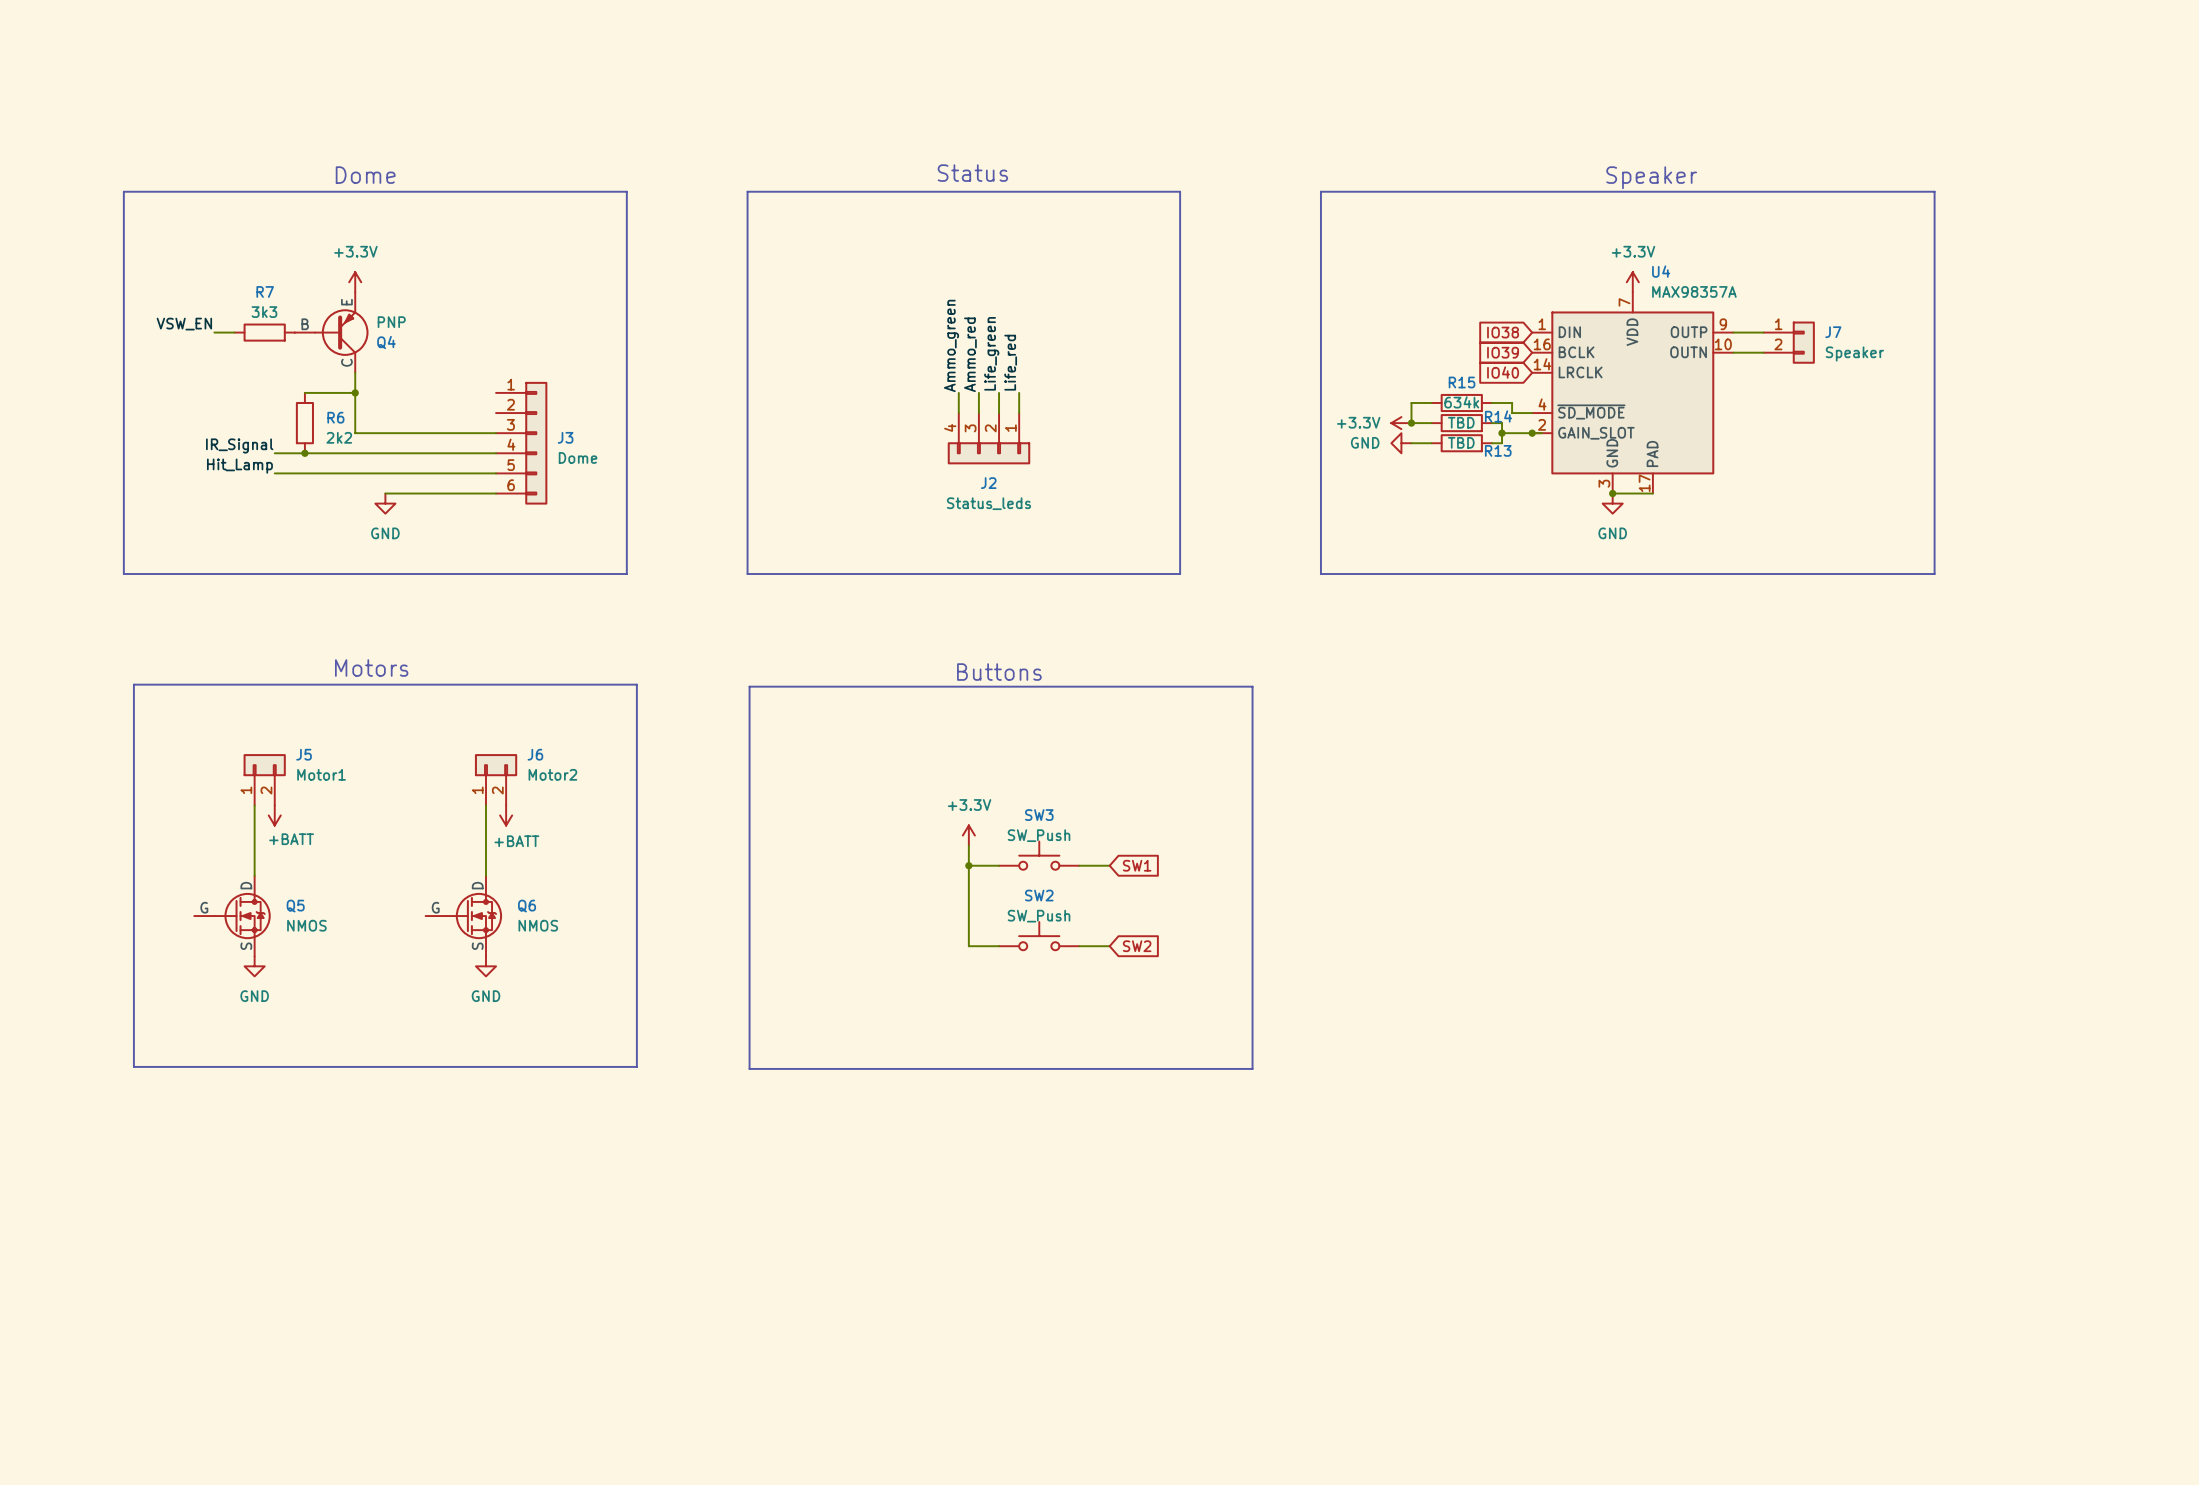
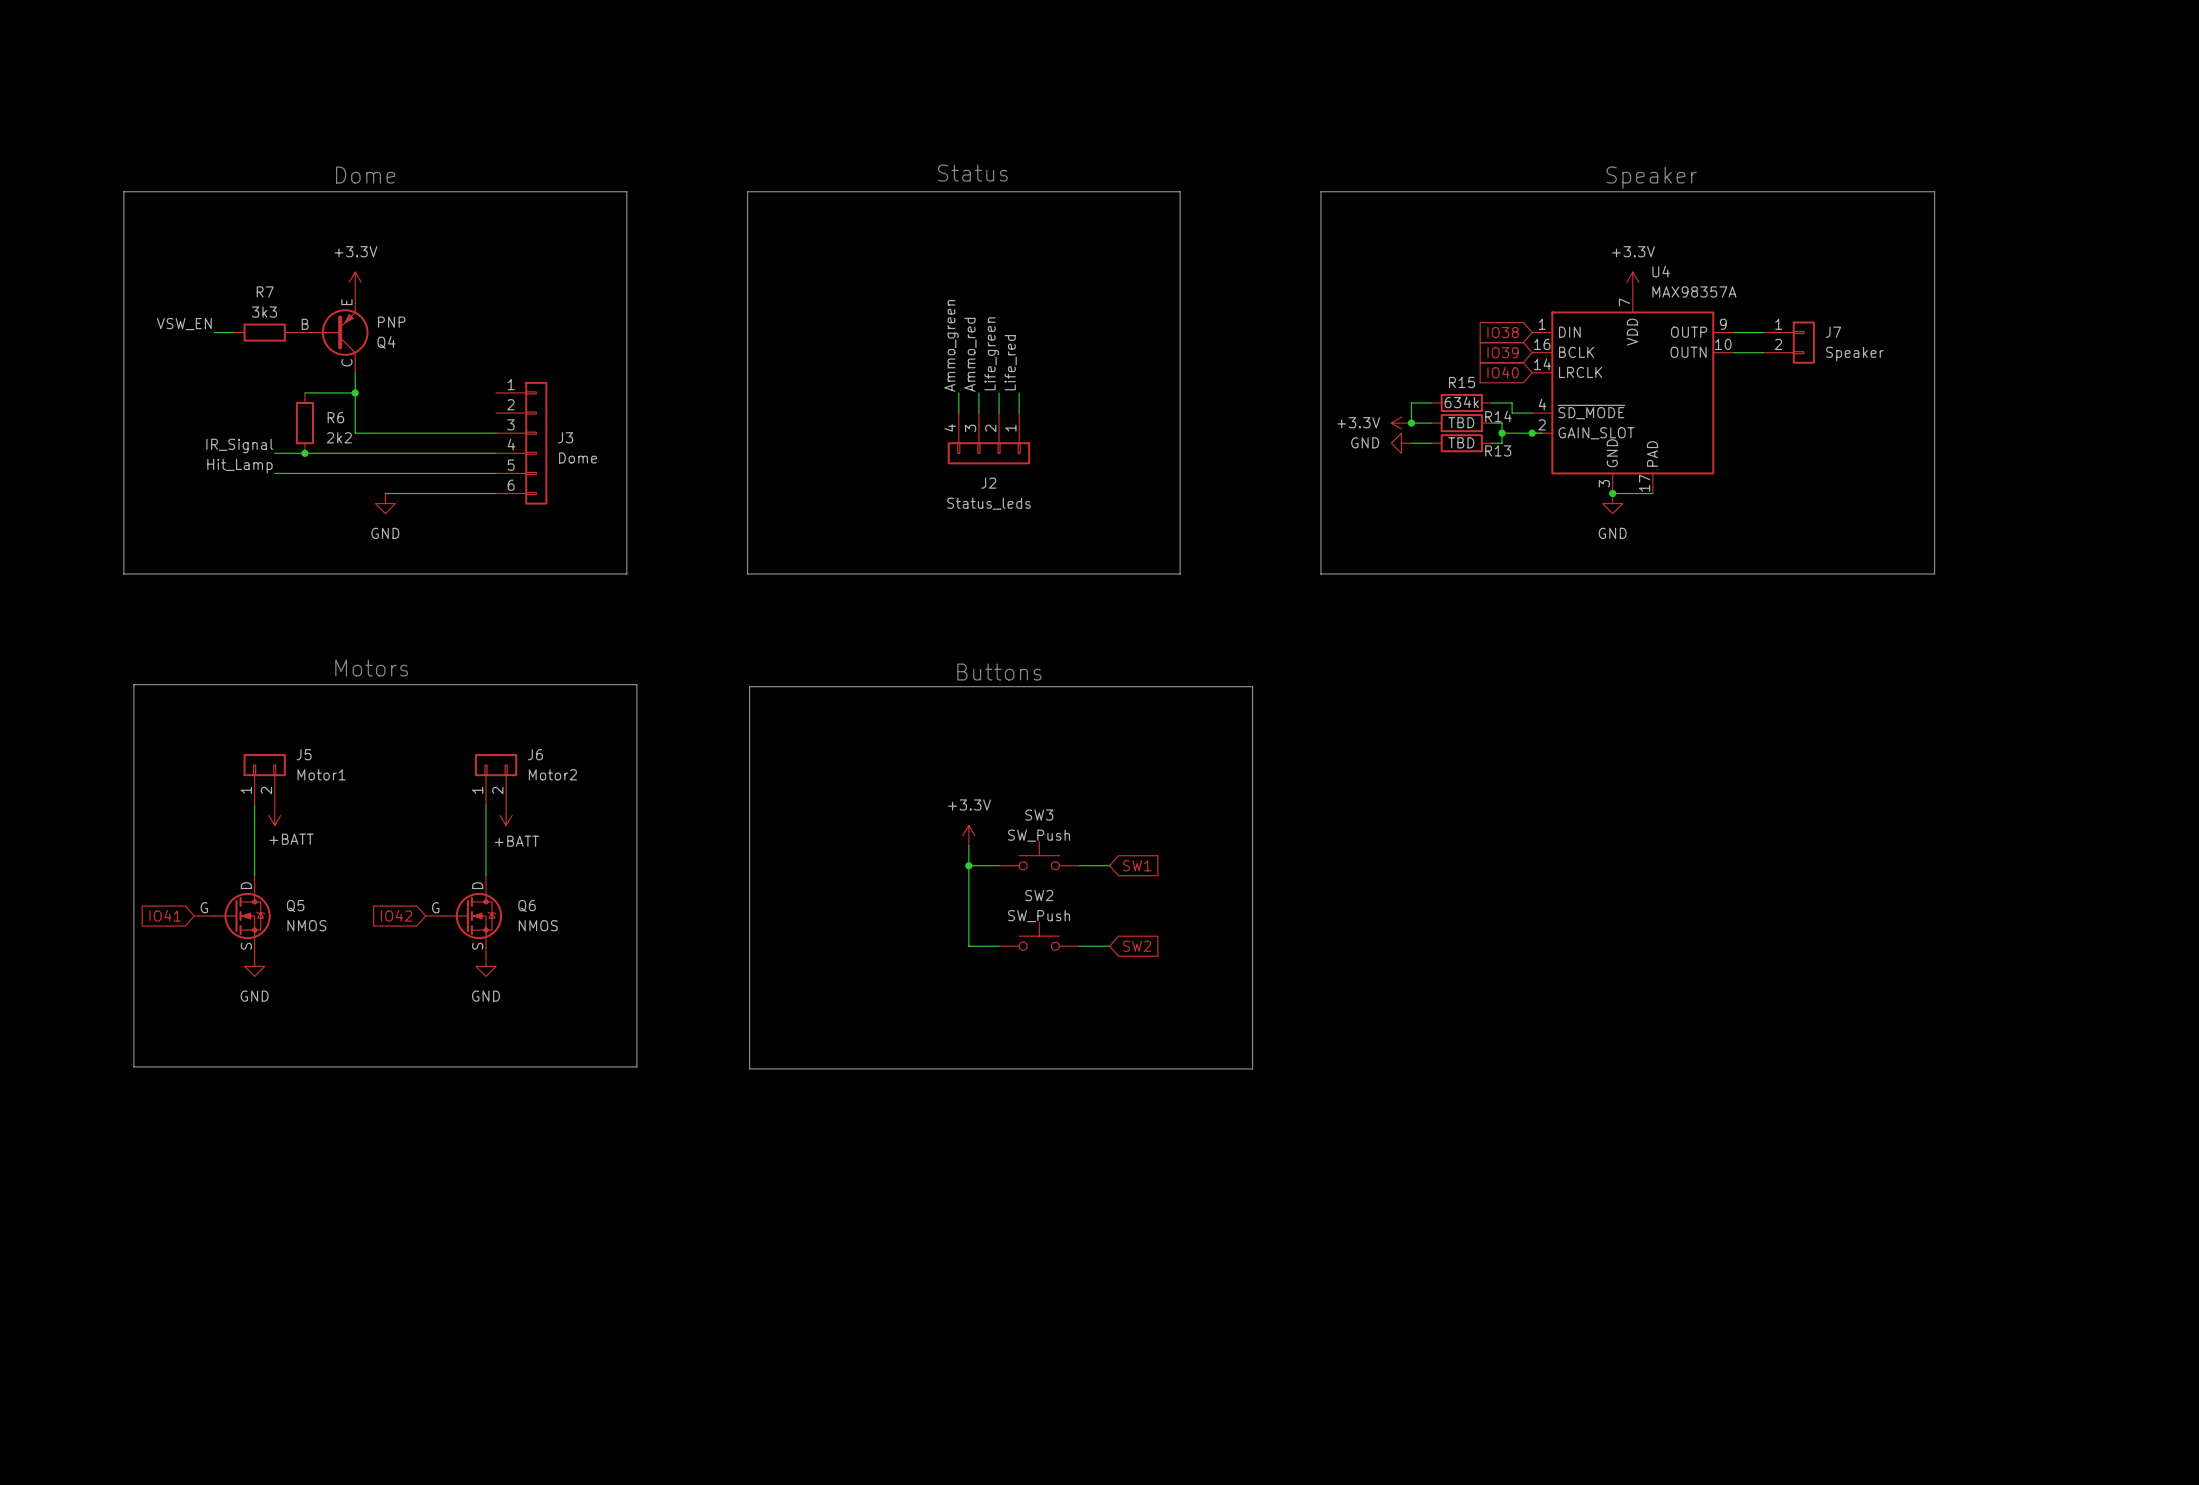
global label: none -> IO41 (165, 915)
global label: none -> IO42 (396, 915)

